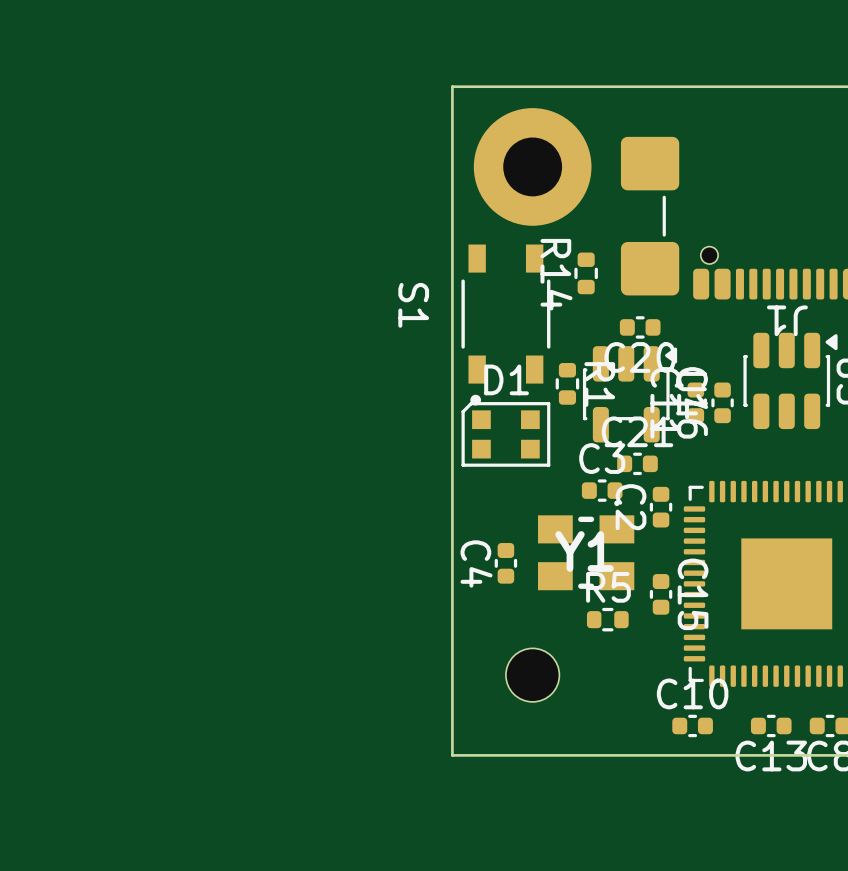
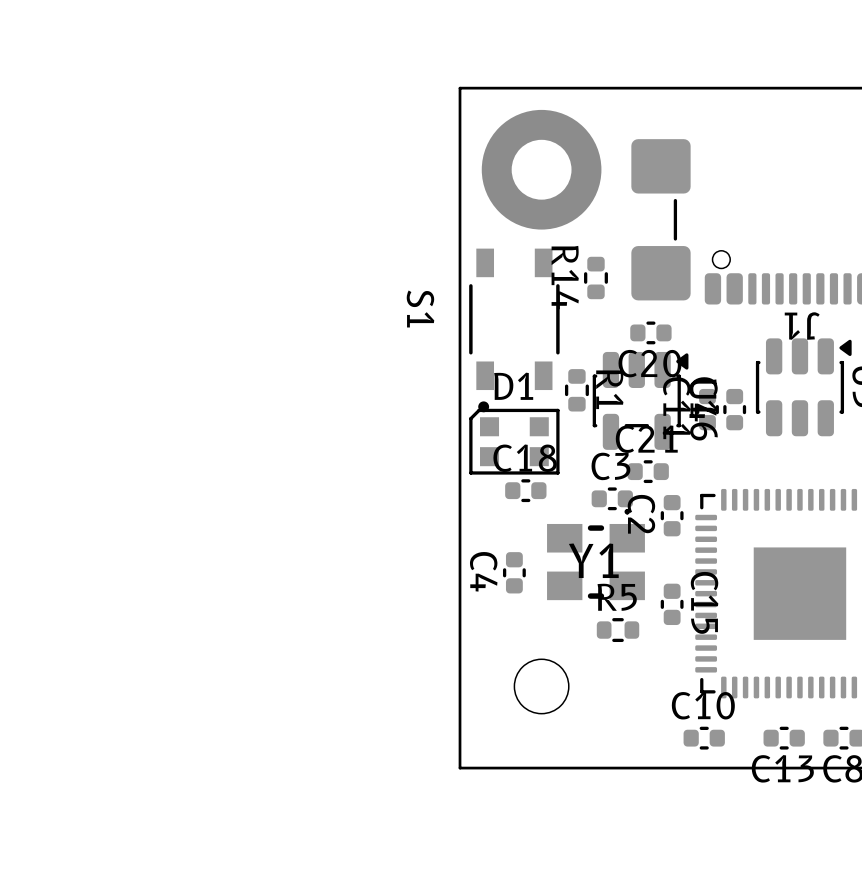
C18: none -> (525, 490)

